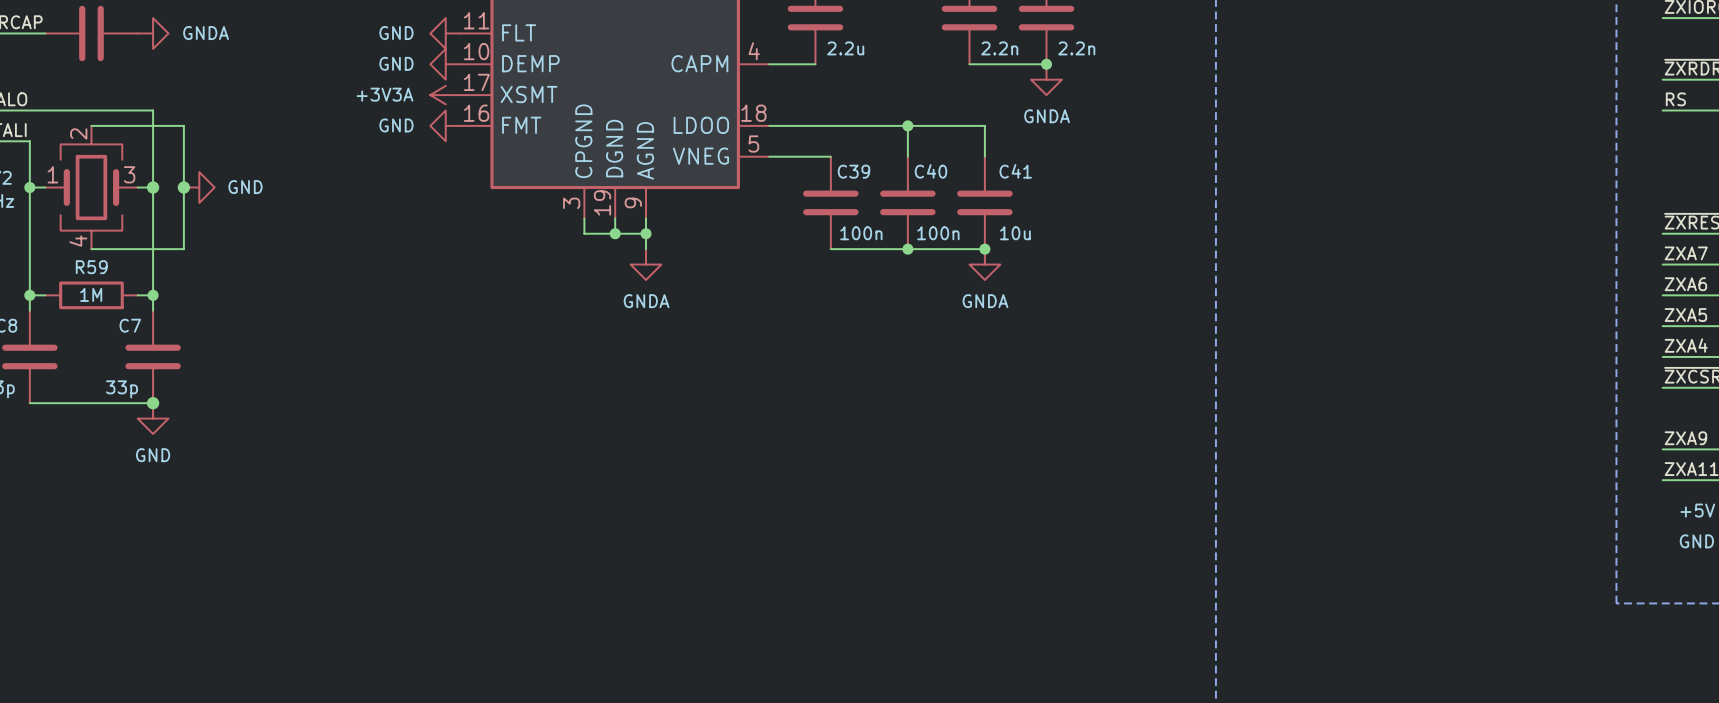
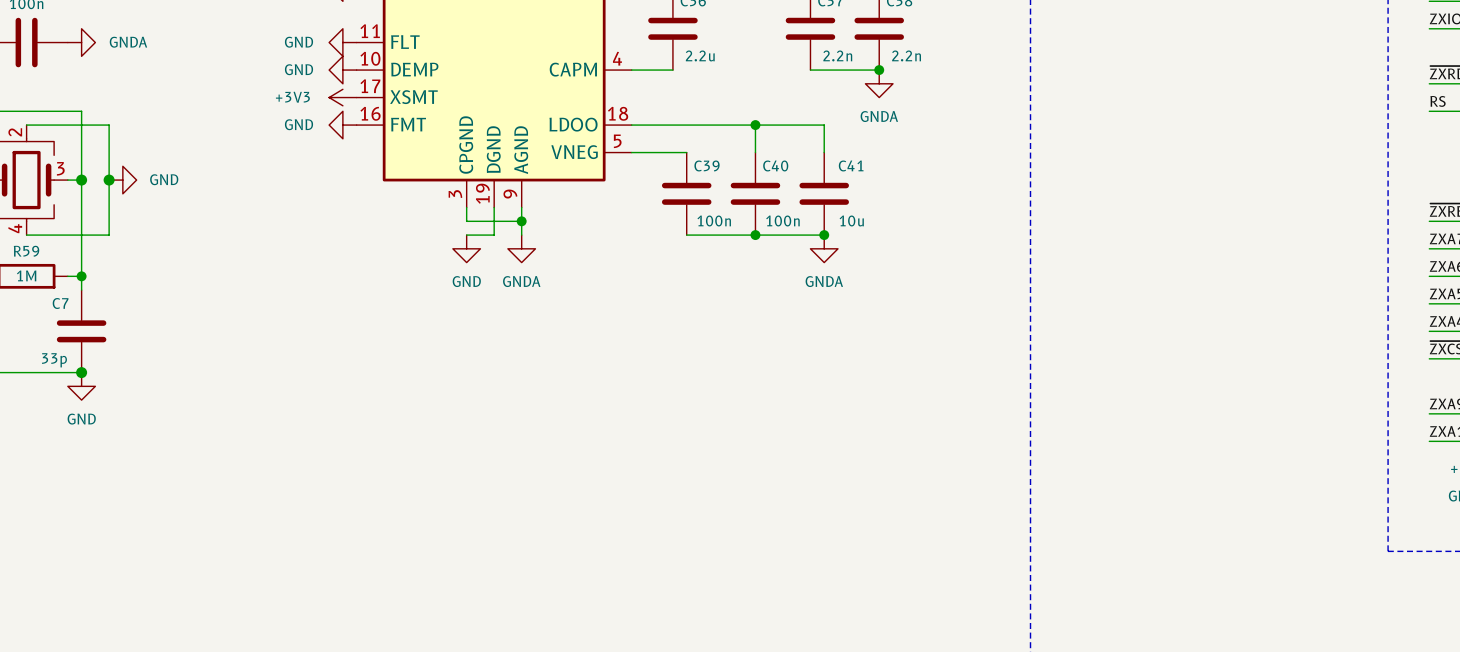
power symbol: +3V3A (445, 95) -> +3V3 (342, 97)
wire: none -> (494, 221) (494, 235) (466, 235)
junction: (615, 233) -> none
power symbol: none -> GND (466, 248)

